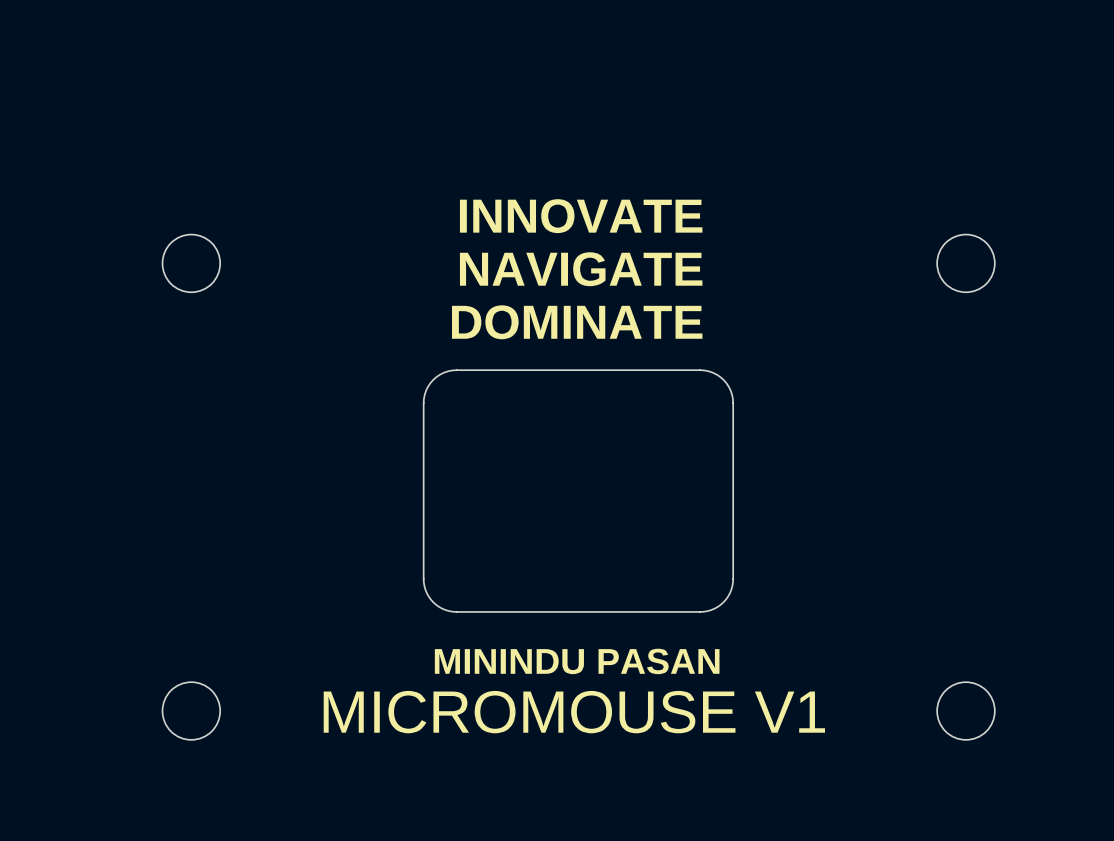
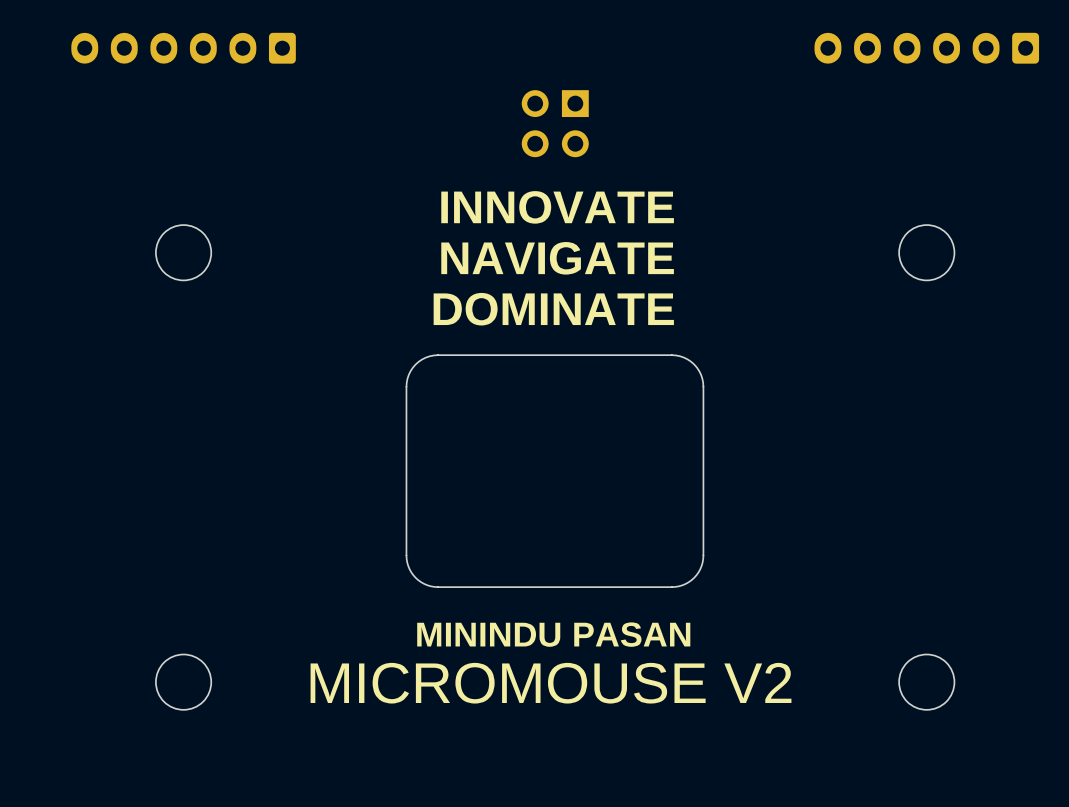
part: none -> (183, 48)
part: none -> (926, 48)
part: none -> (555, 123)
text: MICROMOUSE V1 (574, 712) -> MICROMOUSE V2 (551, 683)

